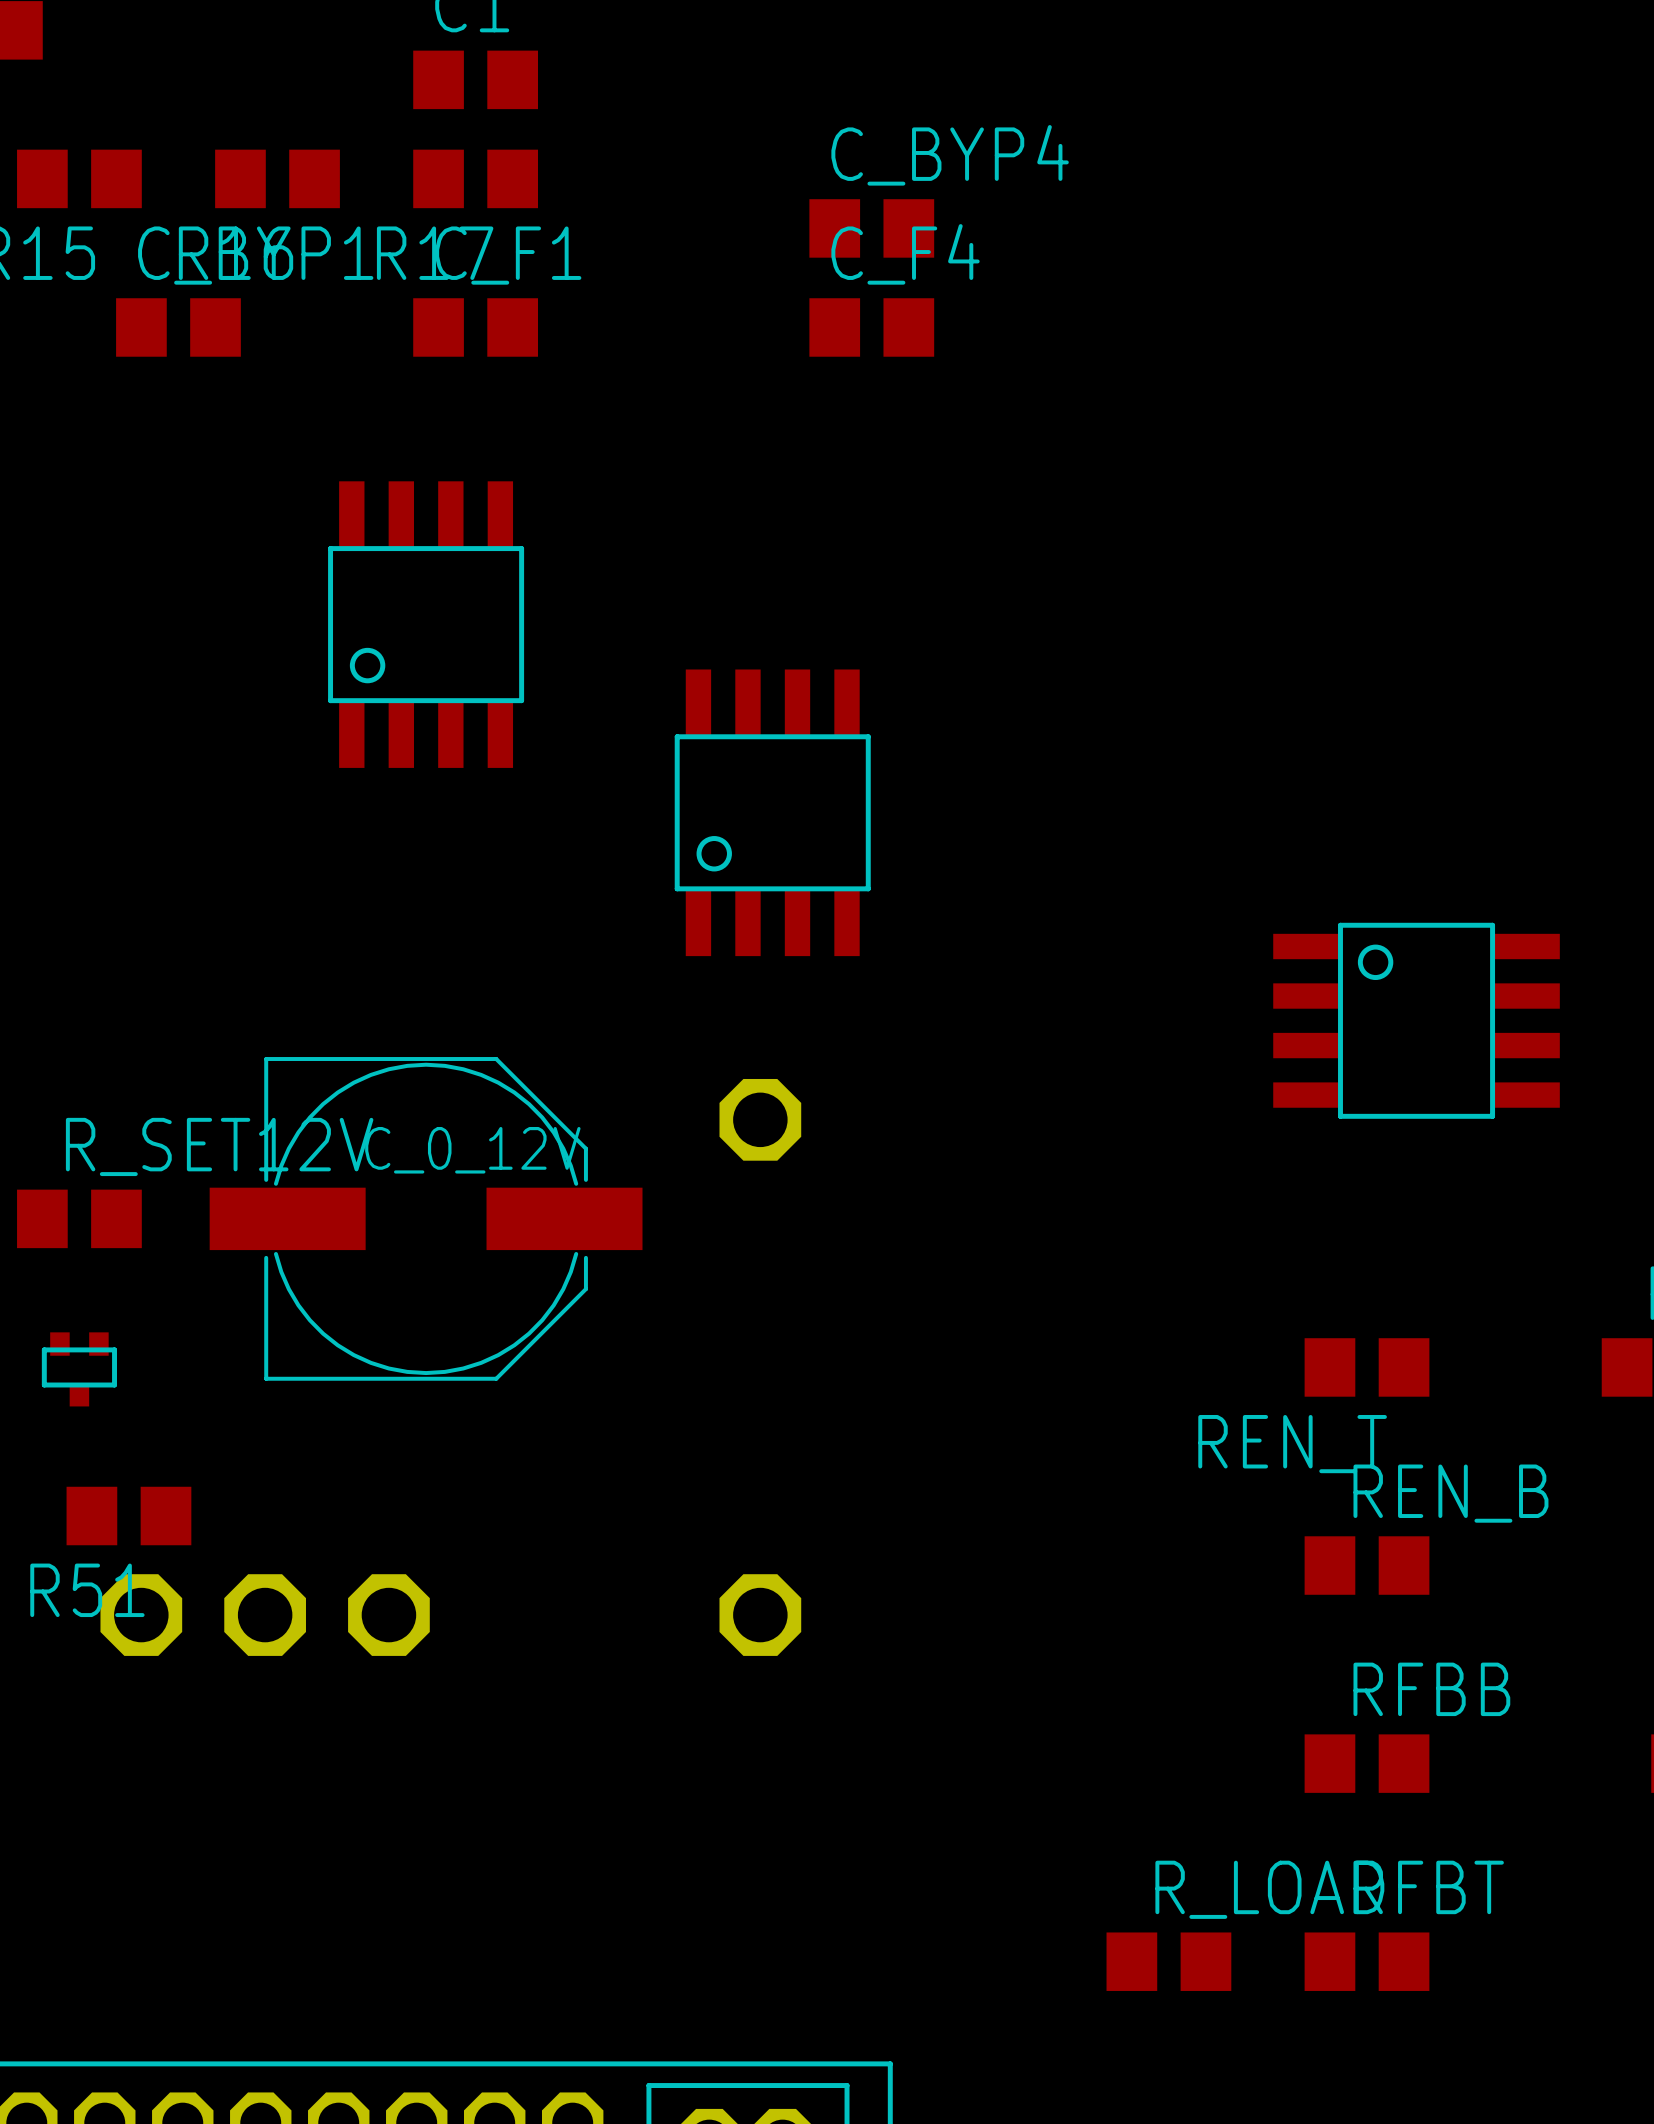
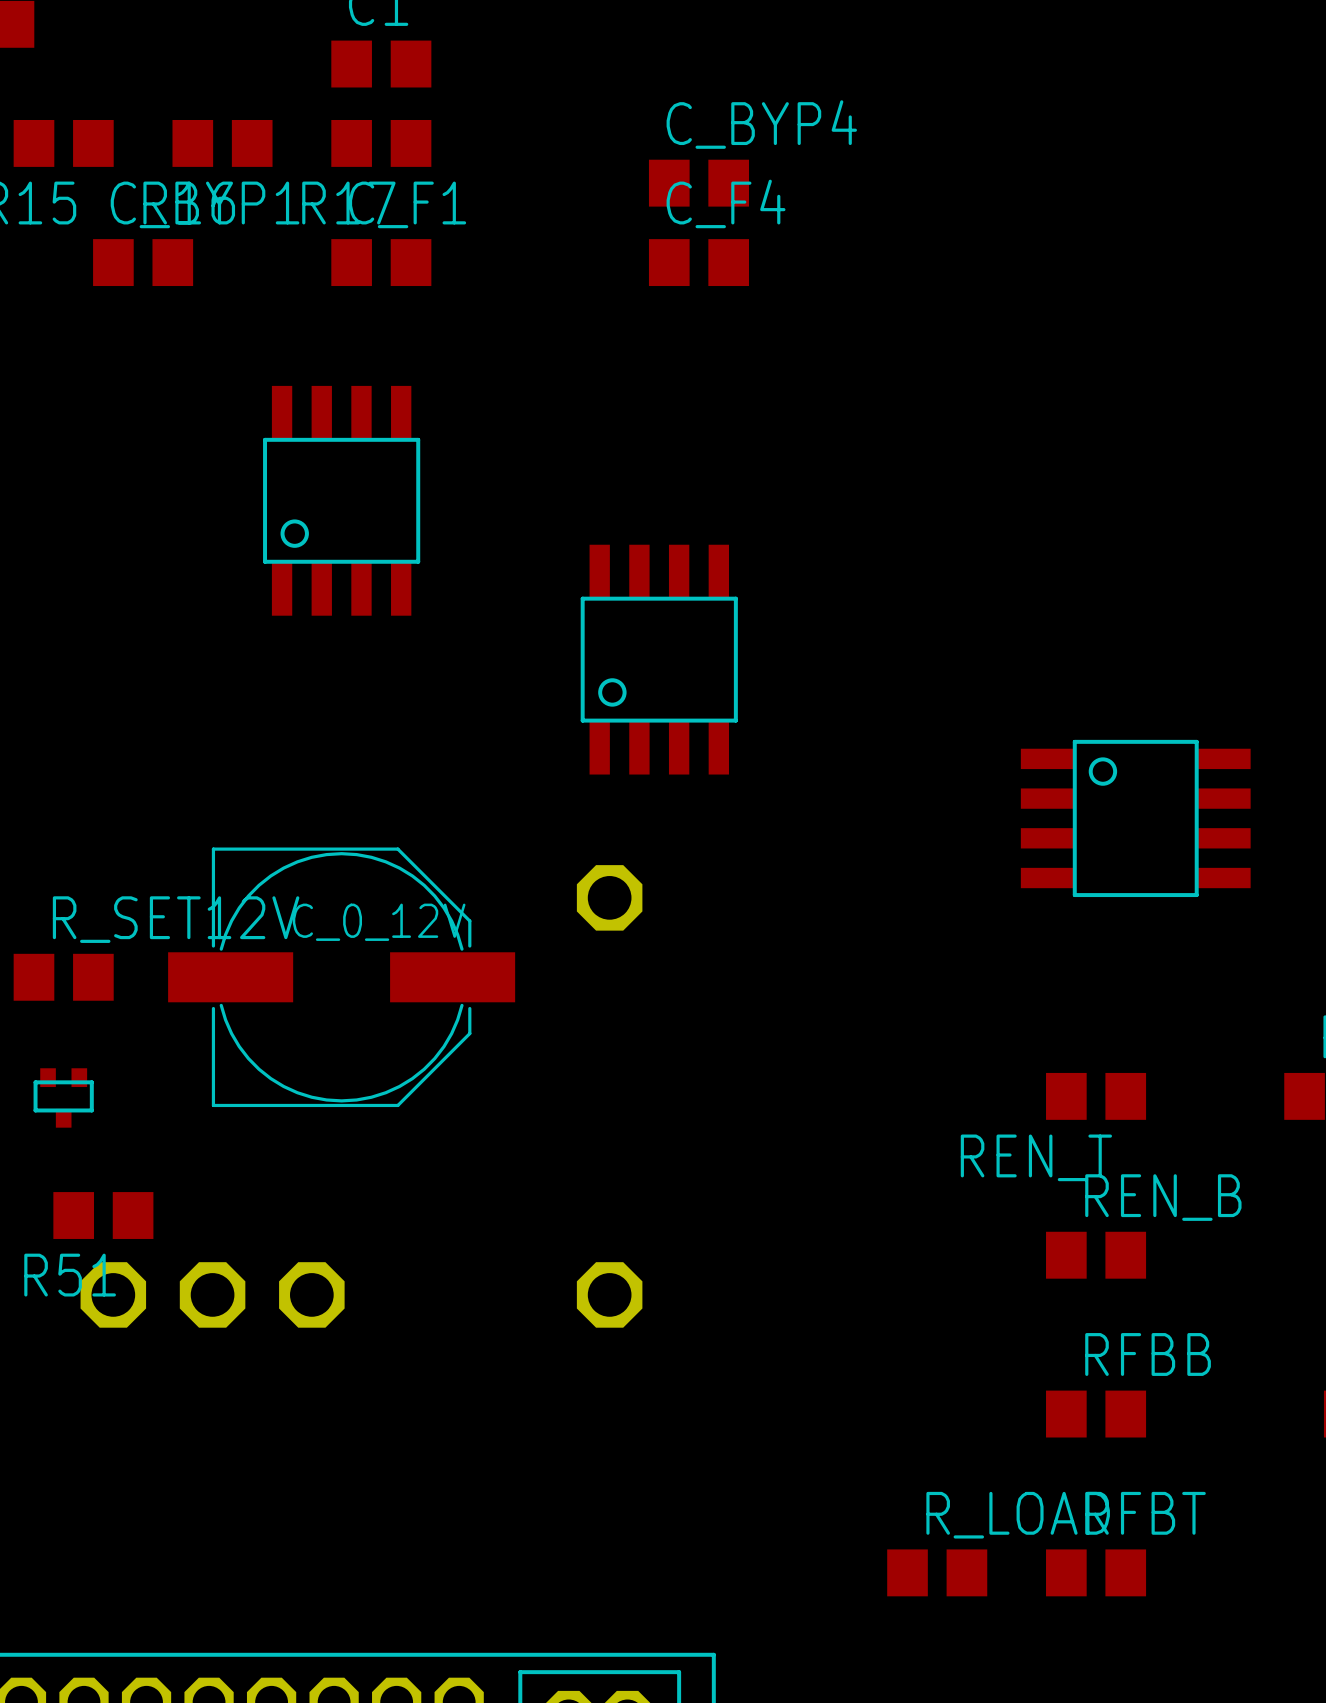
part position: (772, 812) -> (659, 659)

